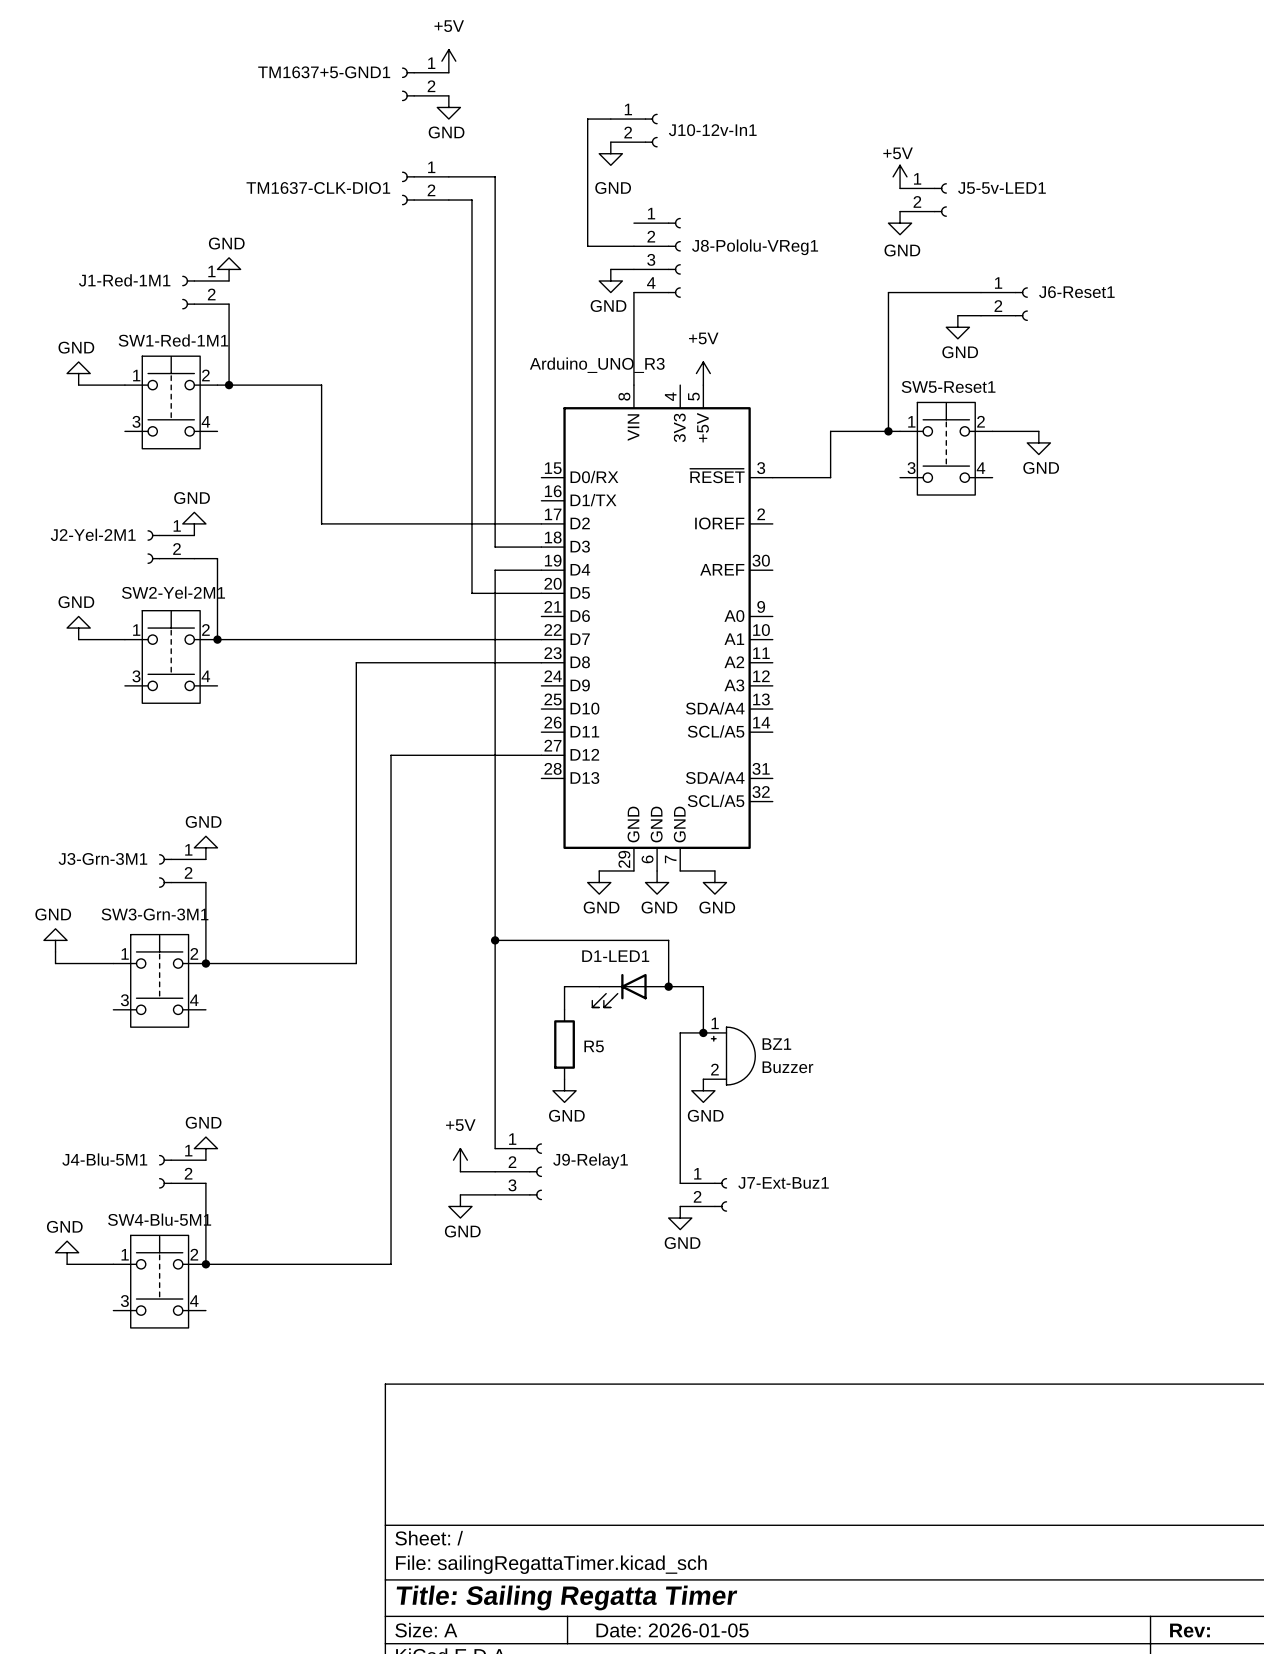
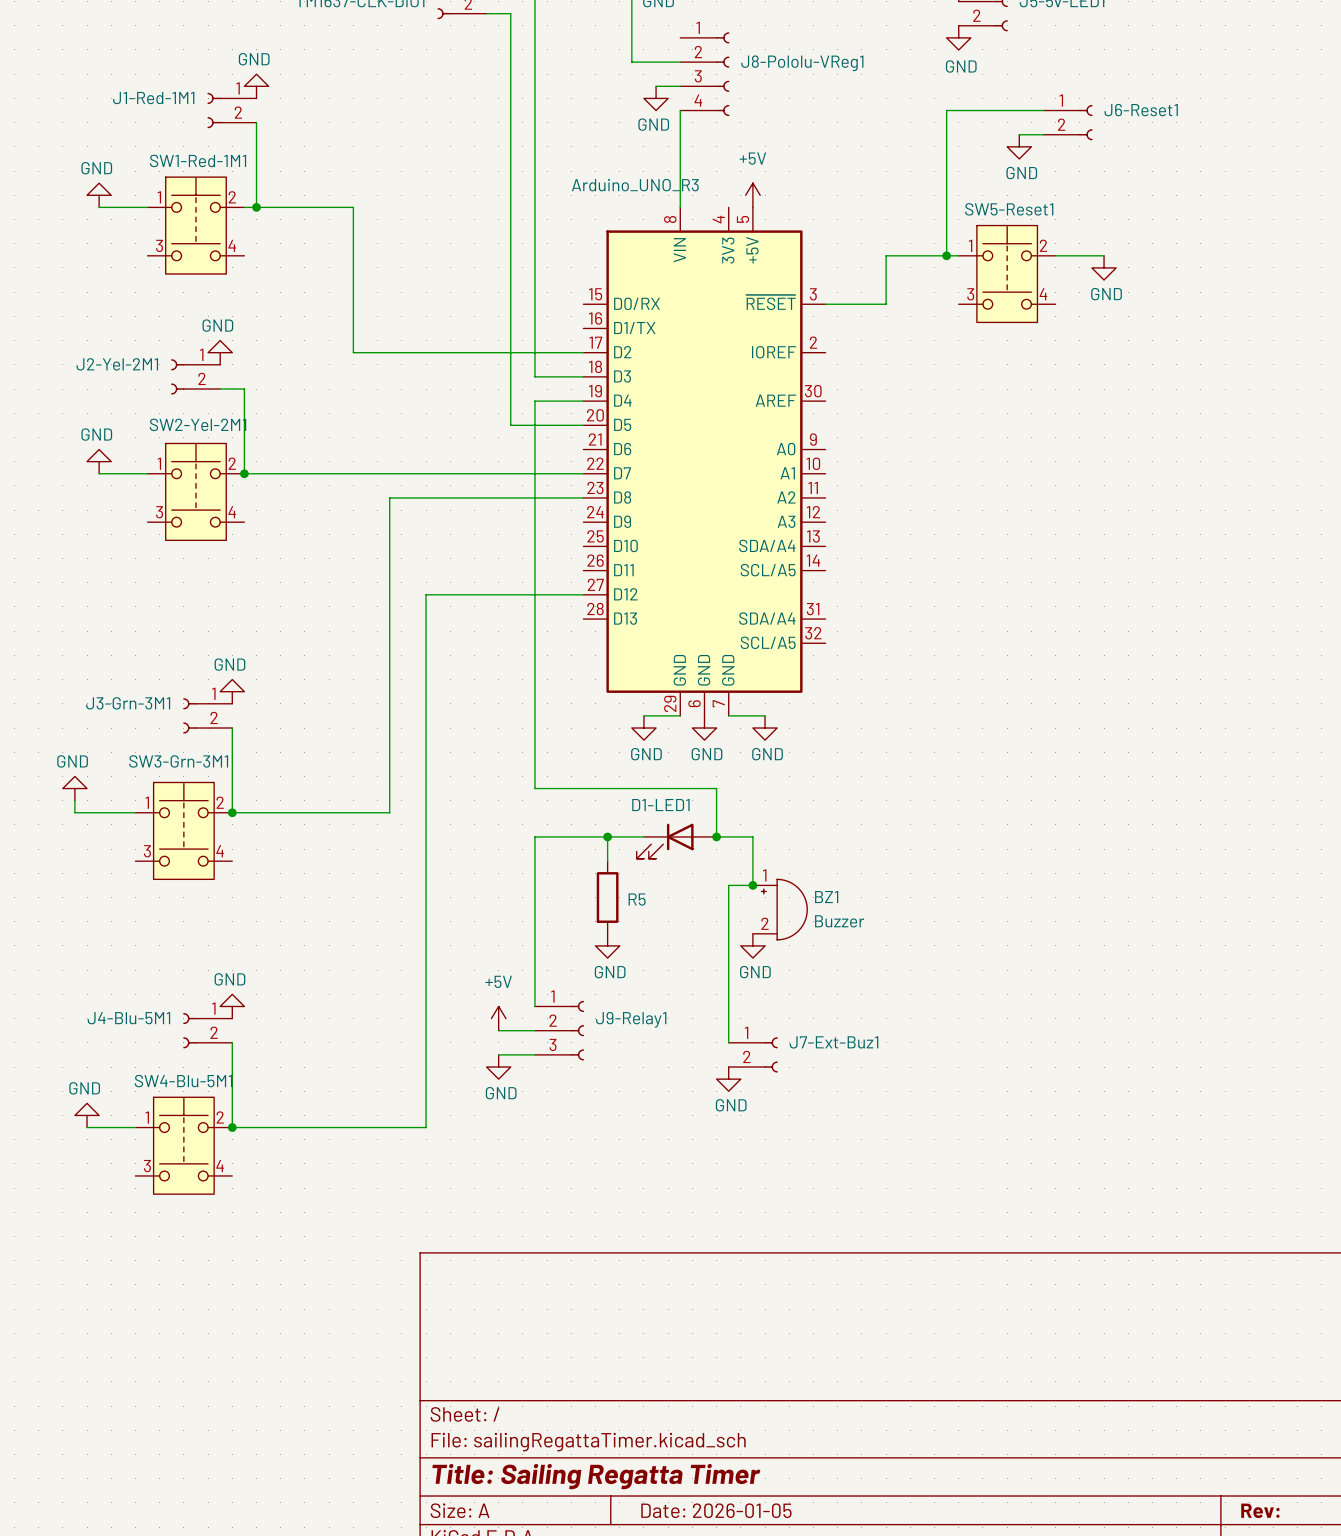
wire: (495, 940) (495, 986) -> (607, 836) (534, 836)
junction: (495, 940) -> none
junction: none -> (607, 836)

